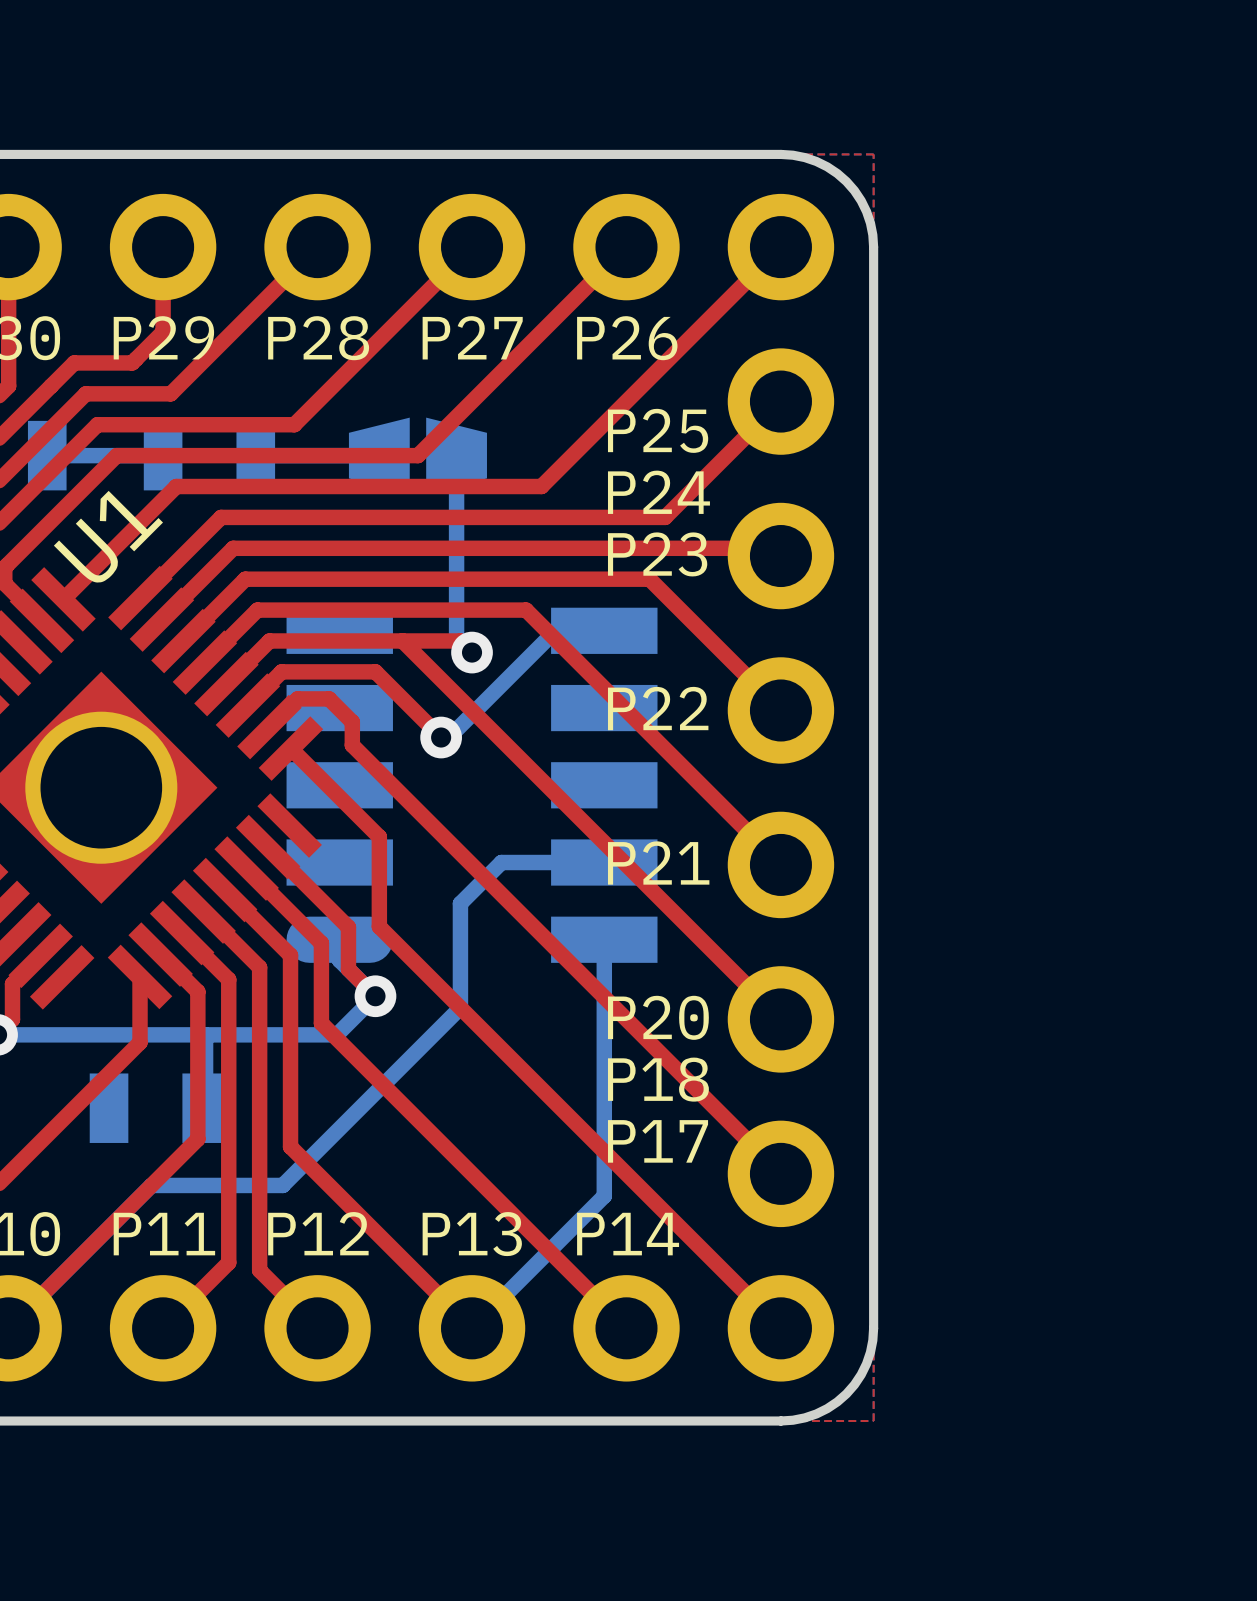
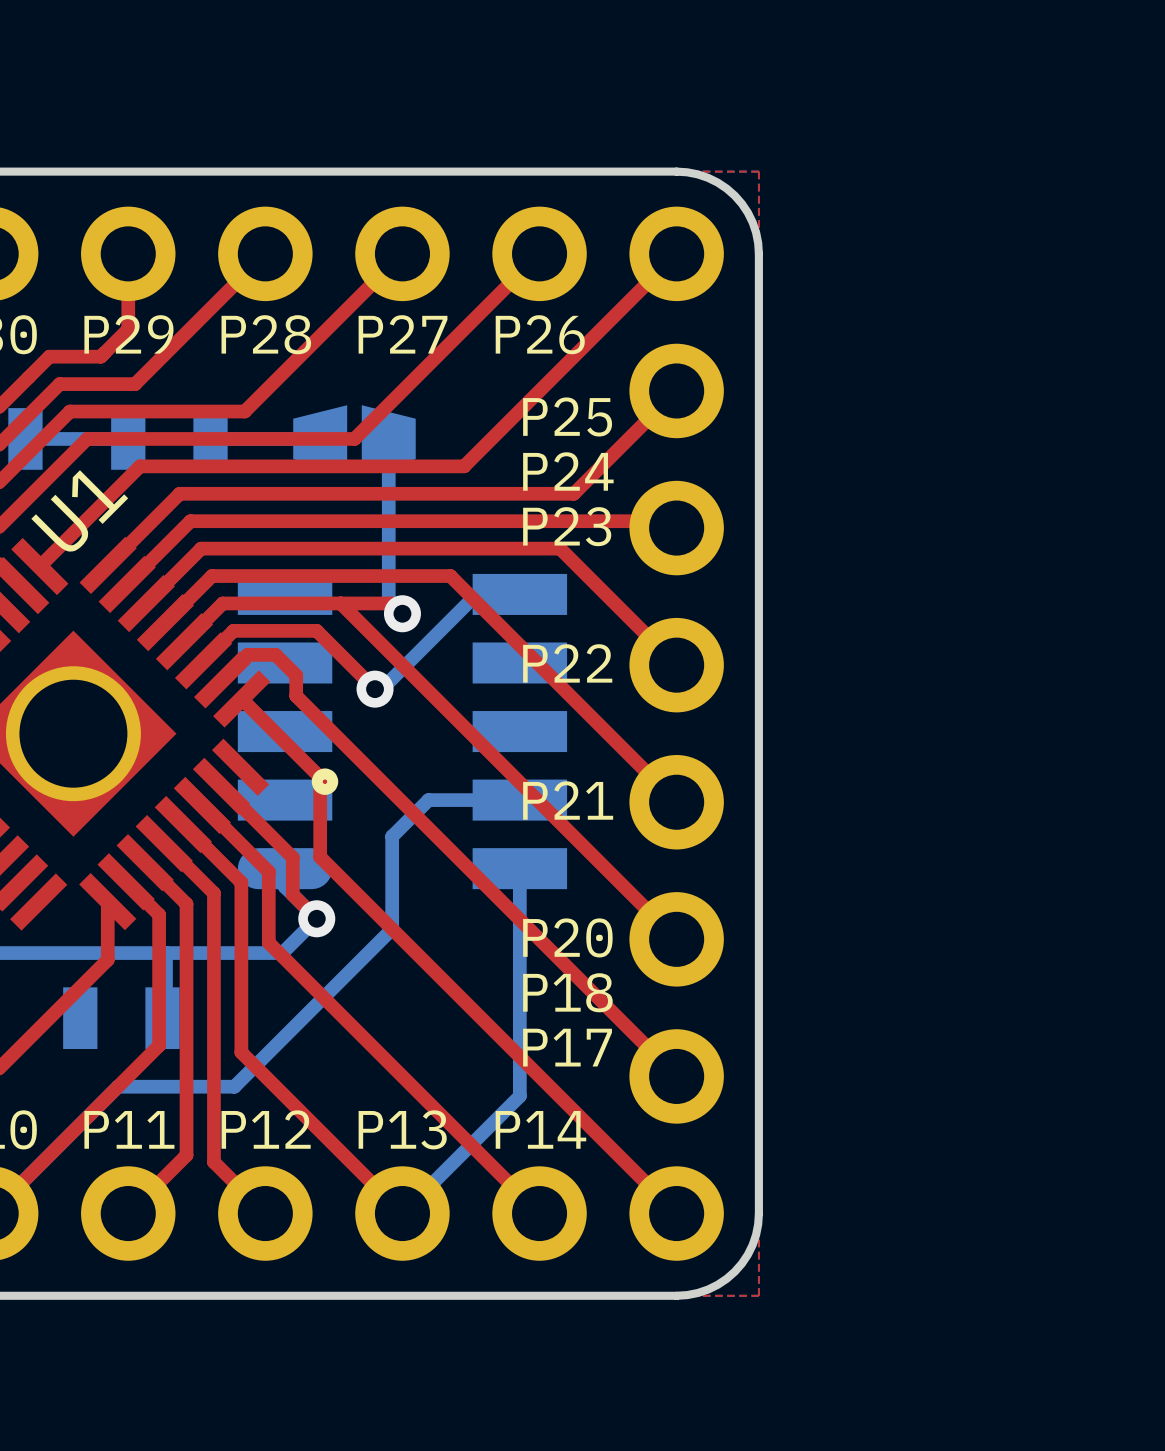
drawing: none -> [311, 768, 339, 795]

